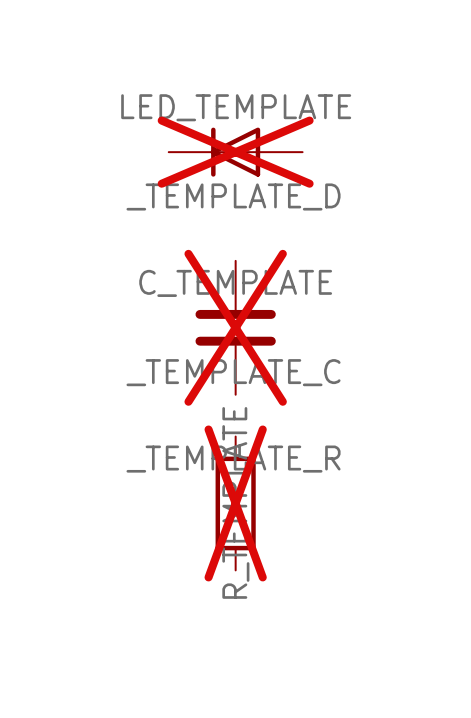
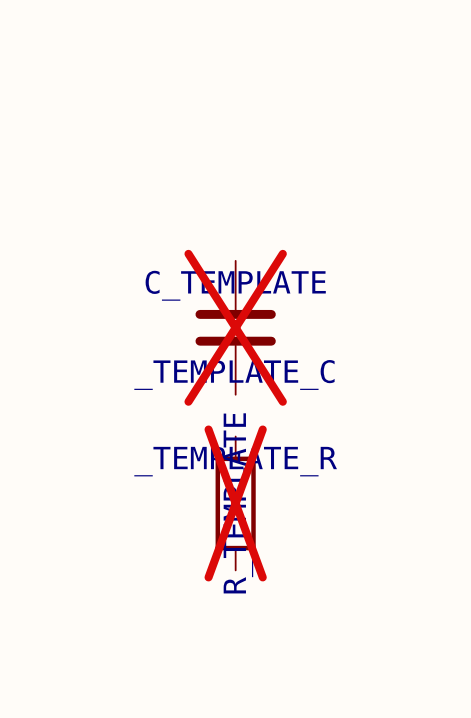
_TEMPLATE_D: LED_TEMPLATE (235, 152) -> none

